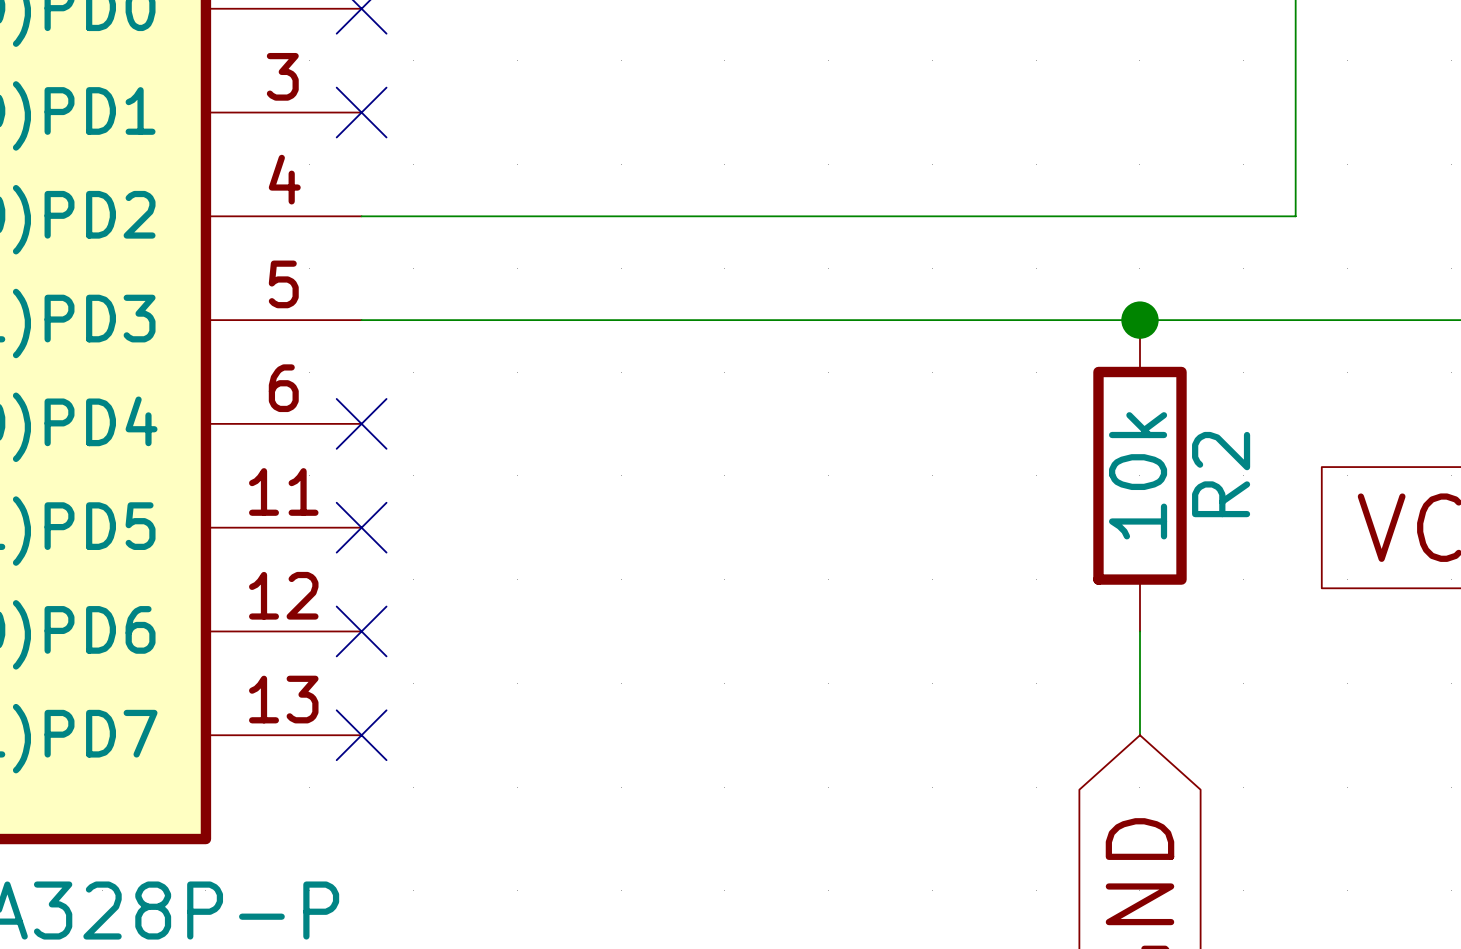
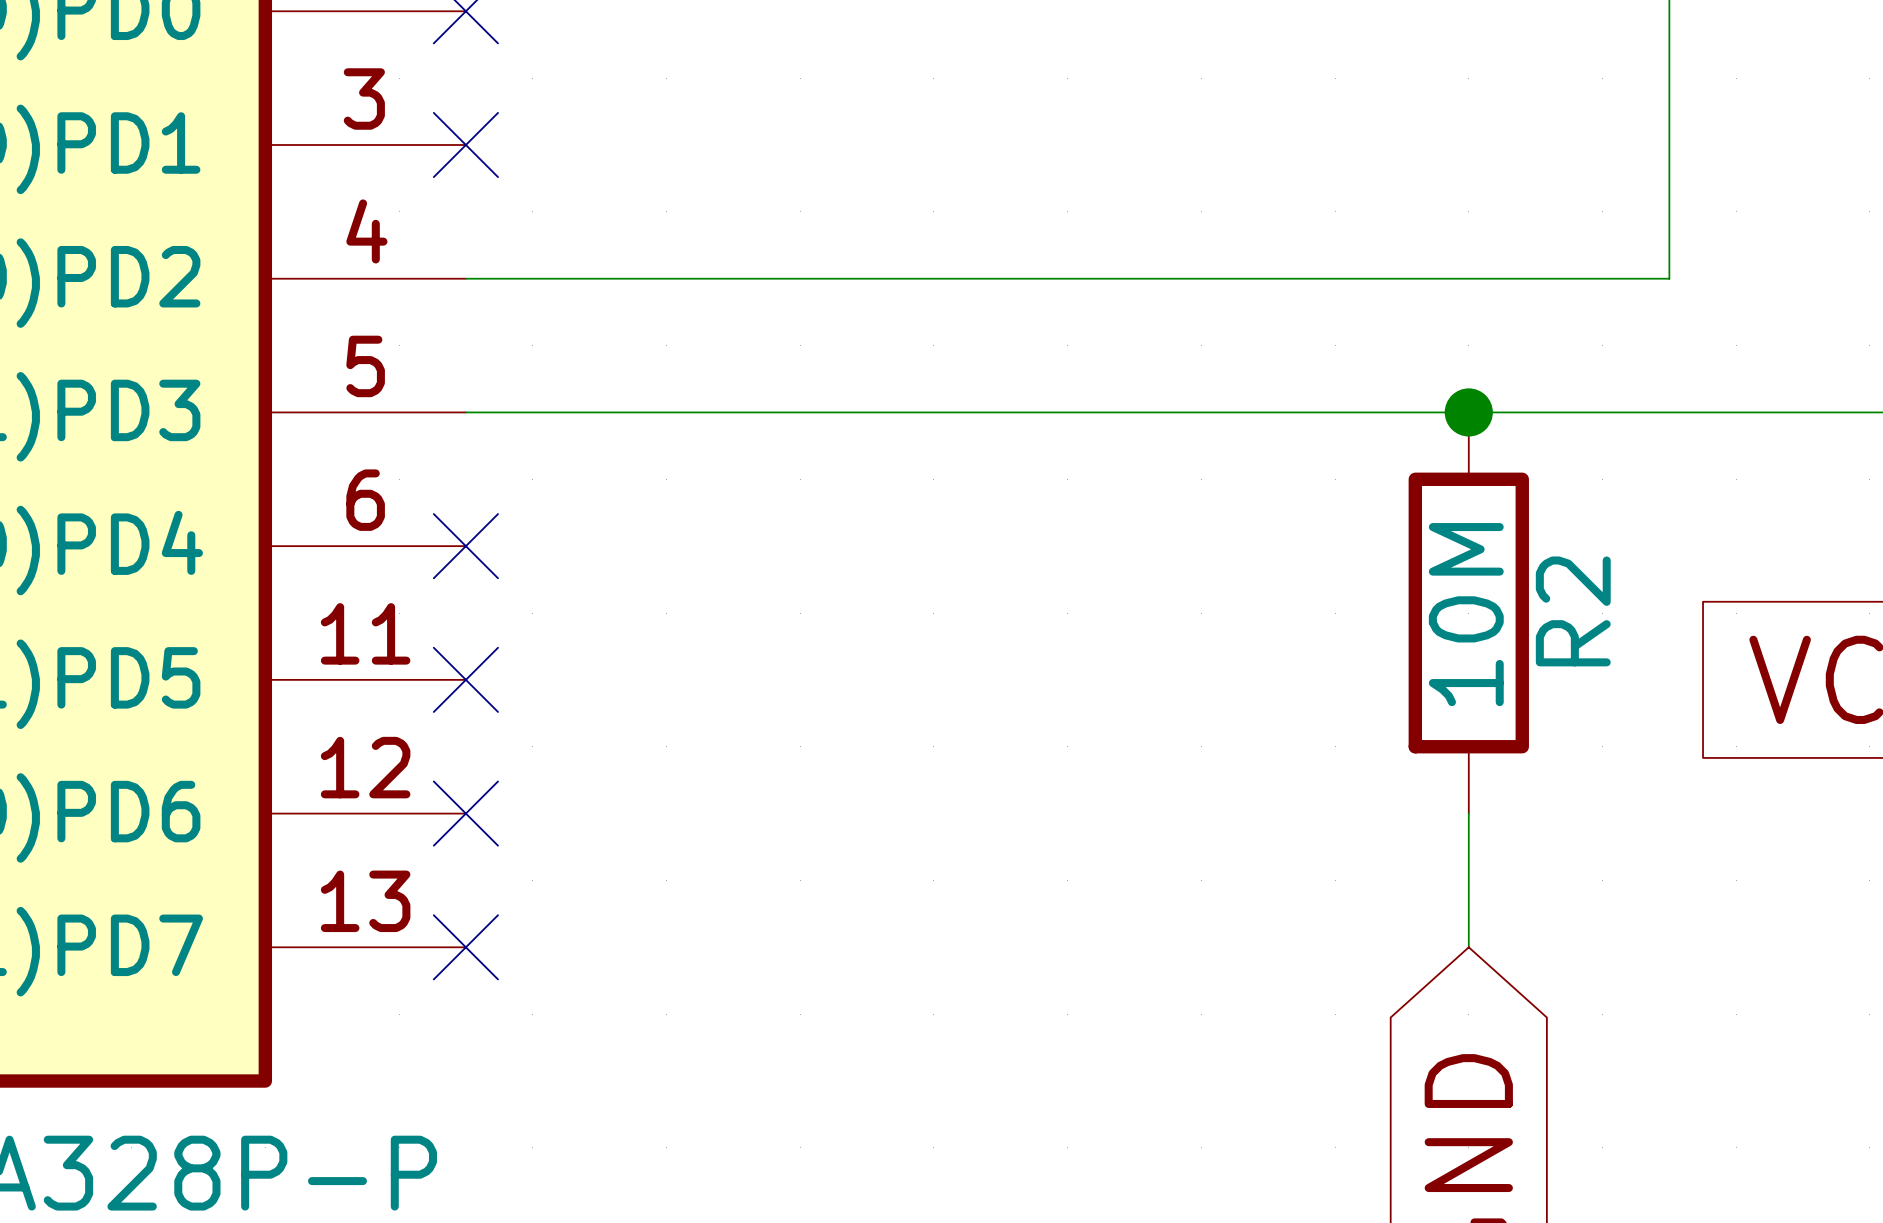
R2 value: 10k (1138, 475) -> 10M (1466, 614)

